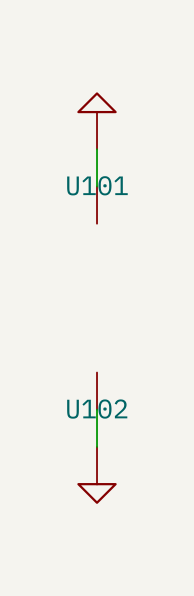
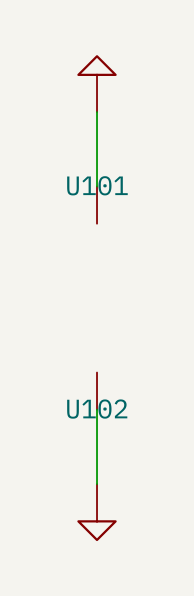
power symbol position: (97, 120) -> (97, 83)
power symbol position: (97, 475) -> (97, 512)

